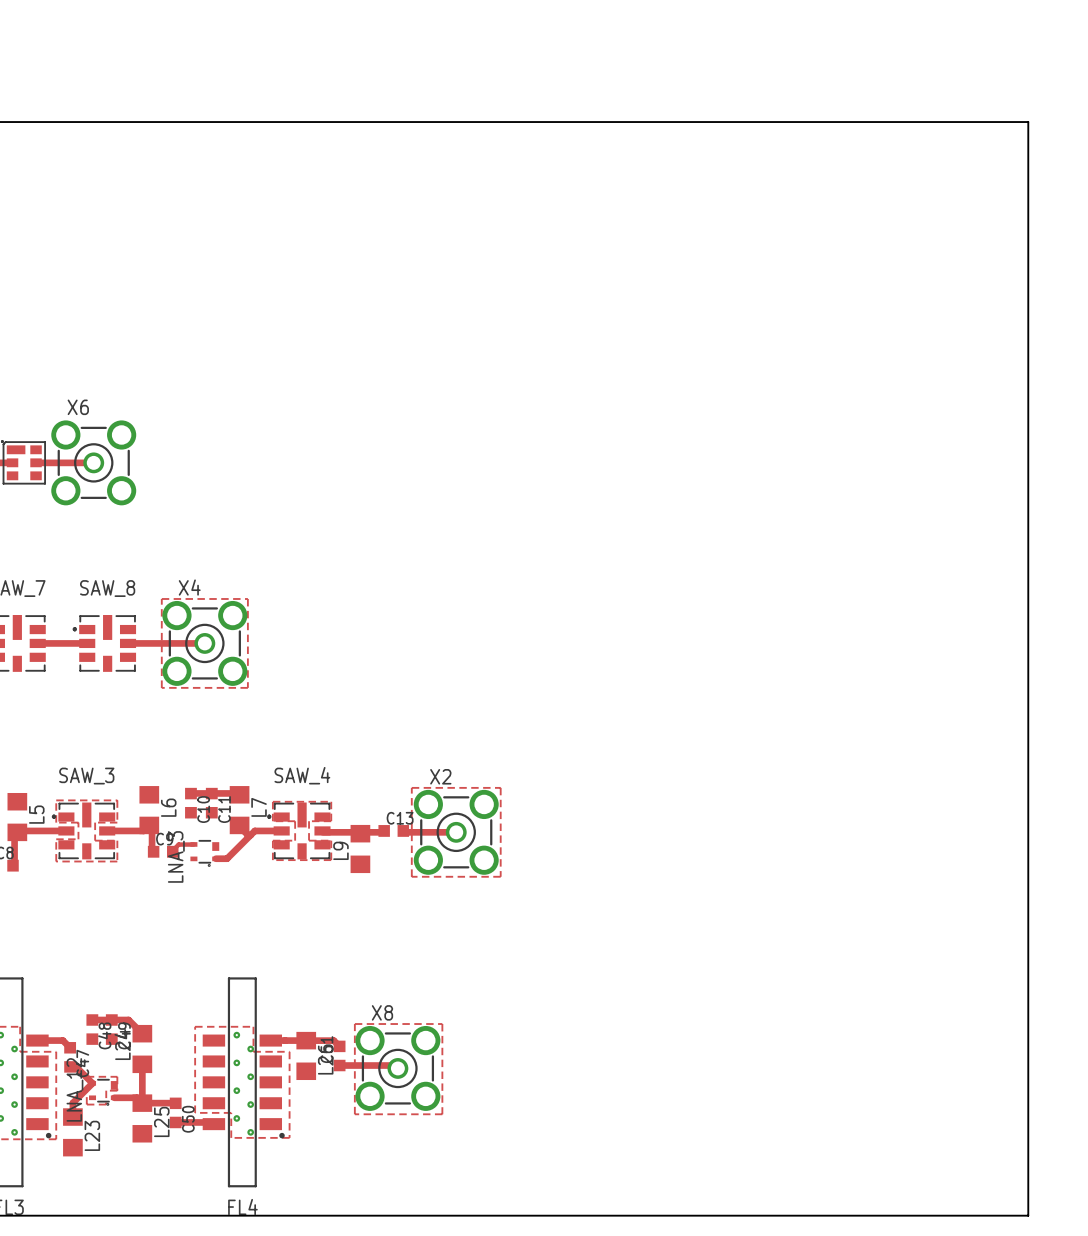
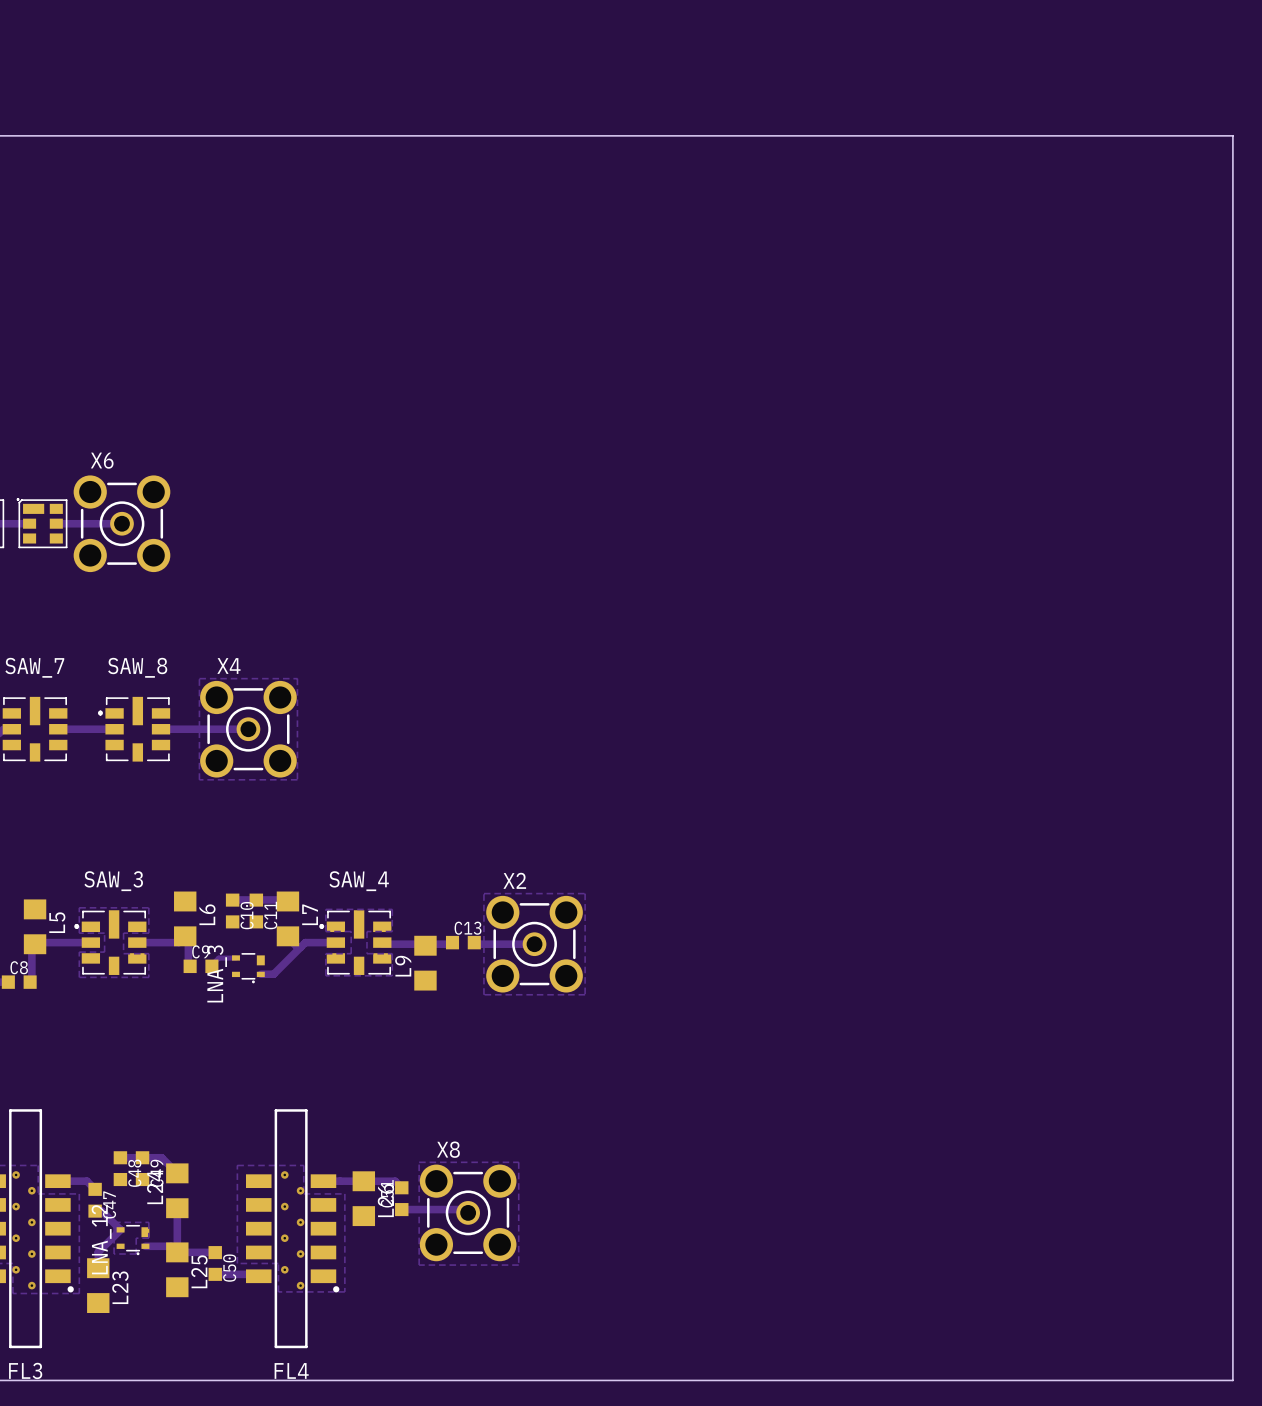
board edge: (1028, 122) (1028, 1215) -> (1185, 135) (1232, 135) (1232, 1380) (1185, 1380)

